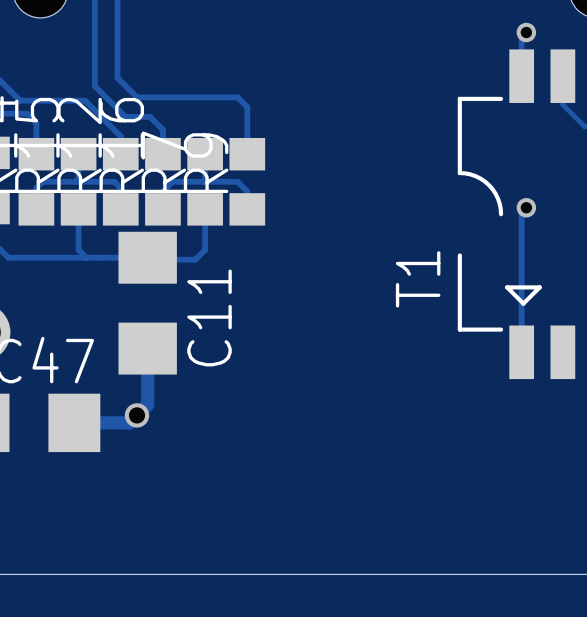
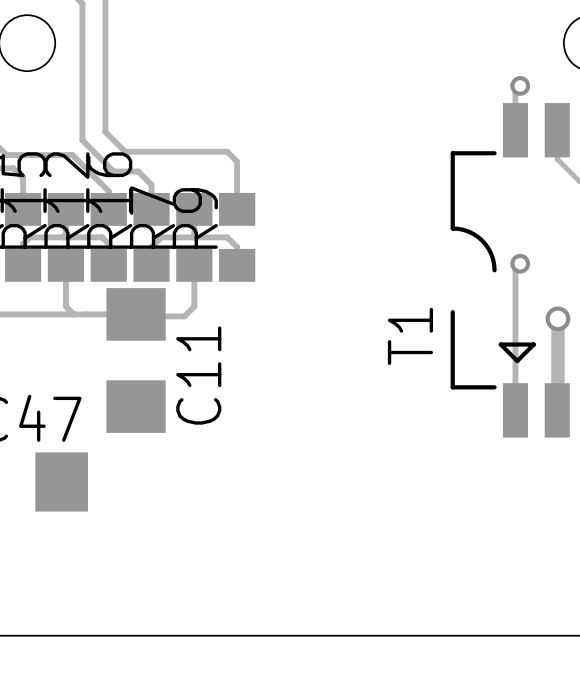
track: none -> (557, 318) (557, 409)
via: none -> (557, 318)
track: (147, 348) (147, 404) (129, 422) (74, 422) -> none
via: (136, 415) -> none

